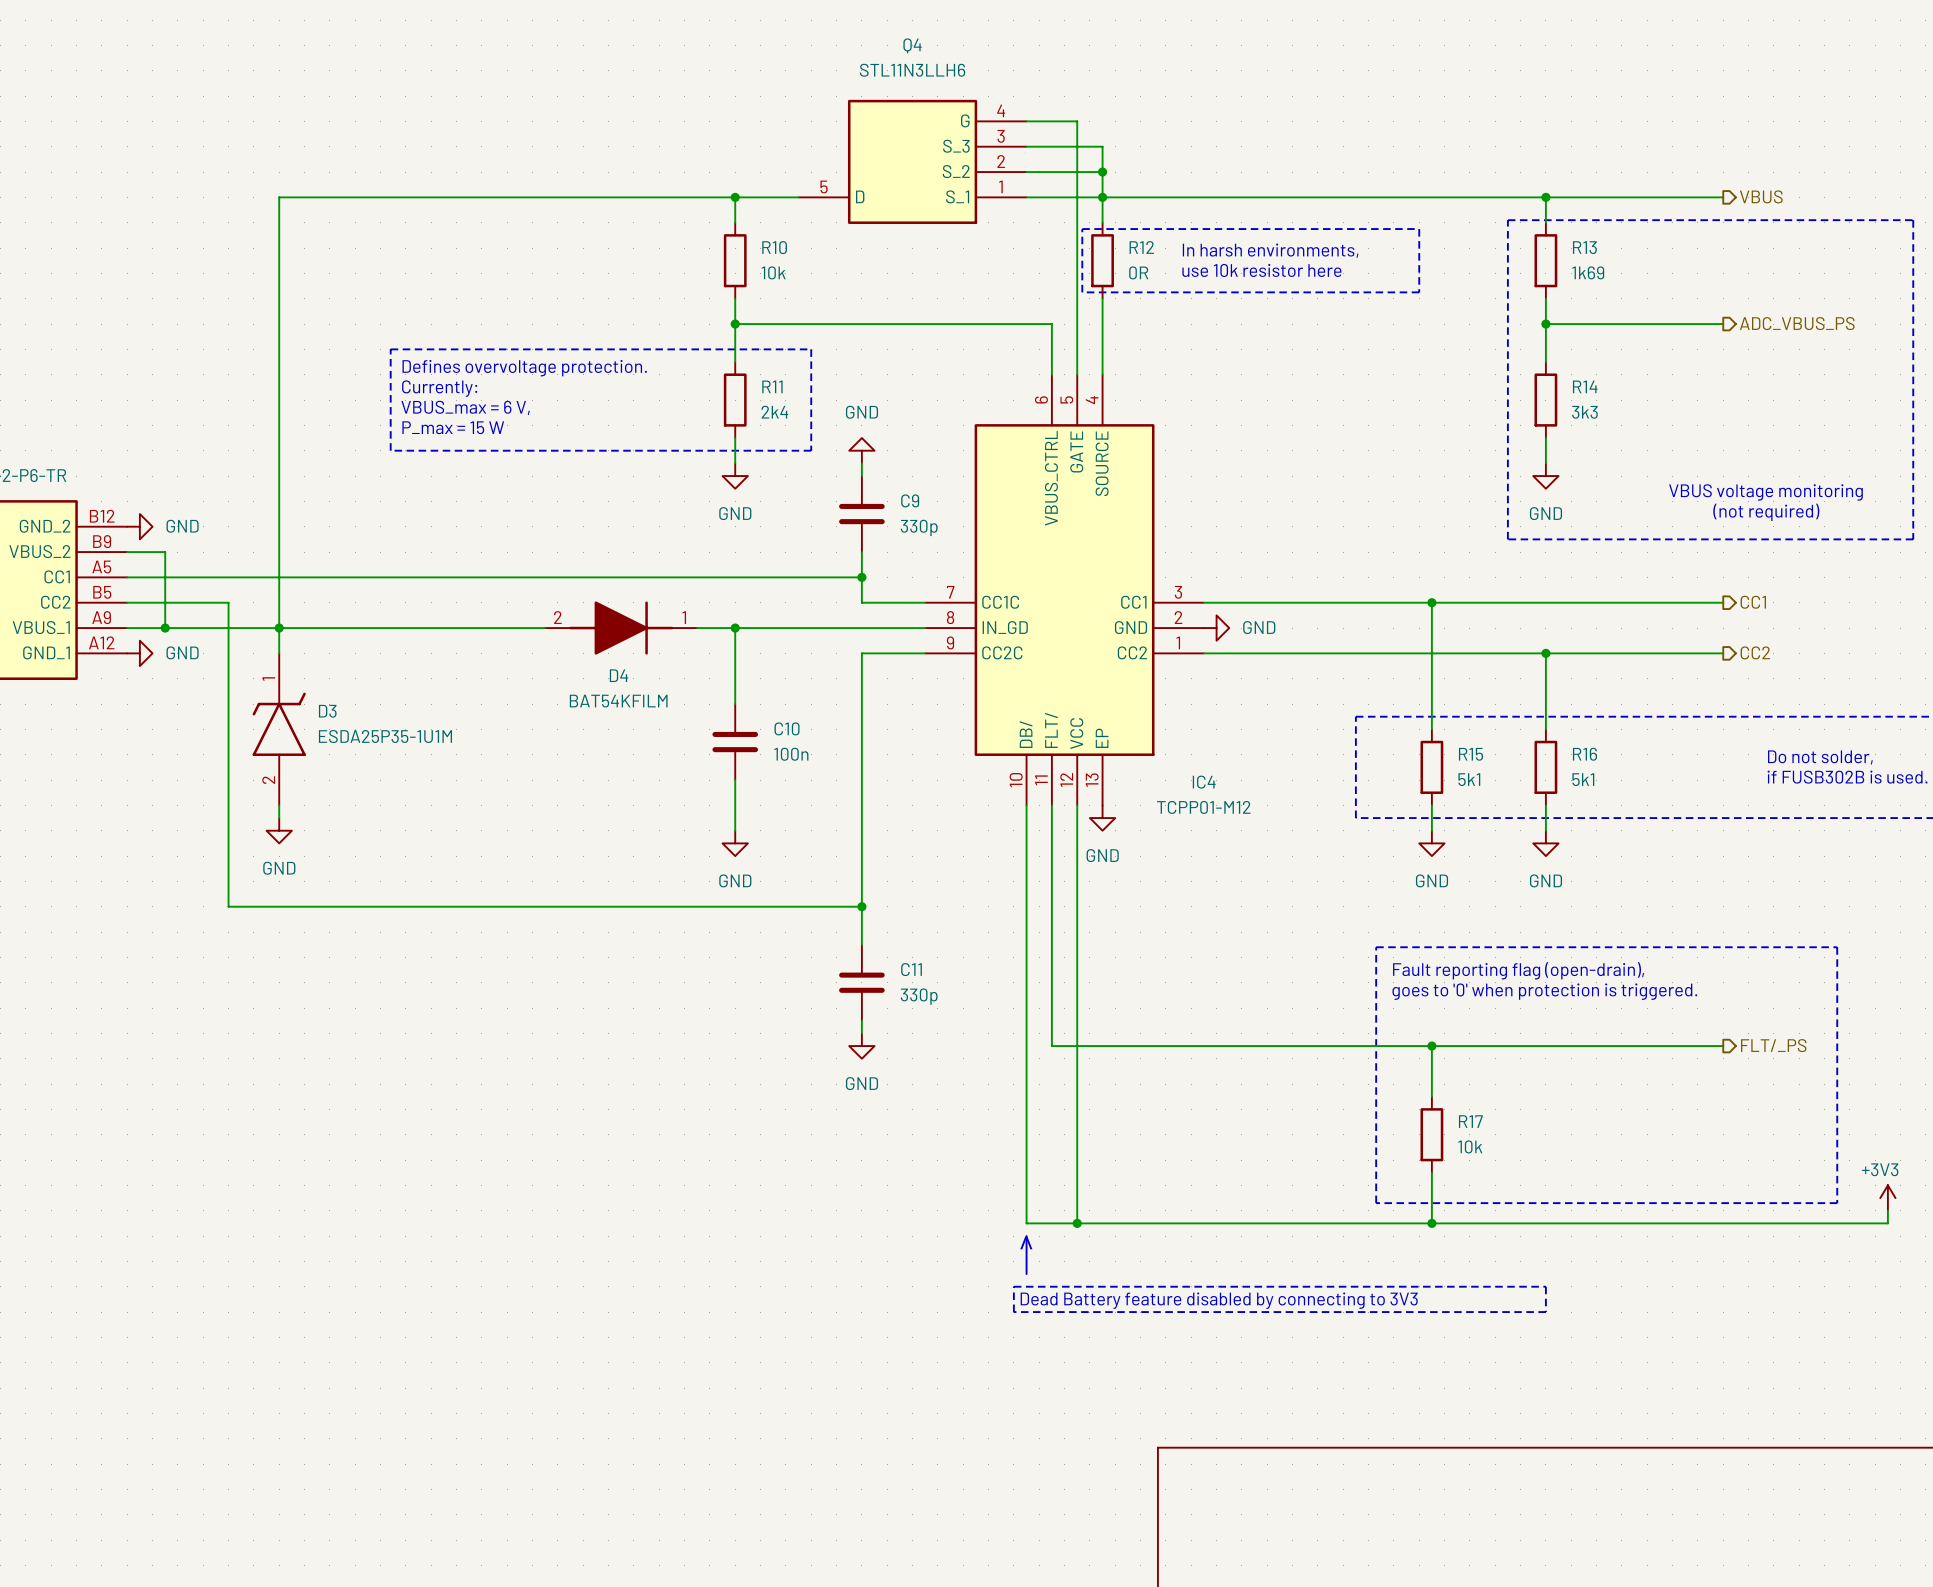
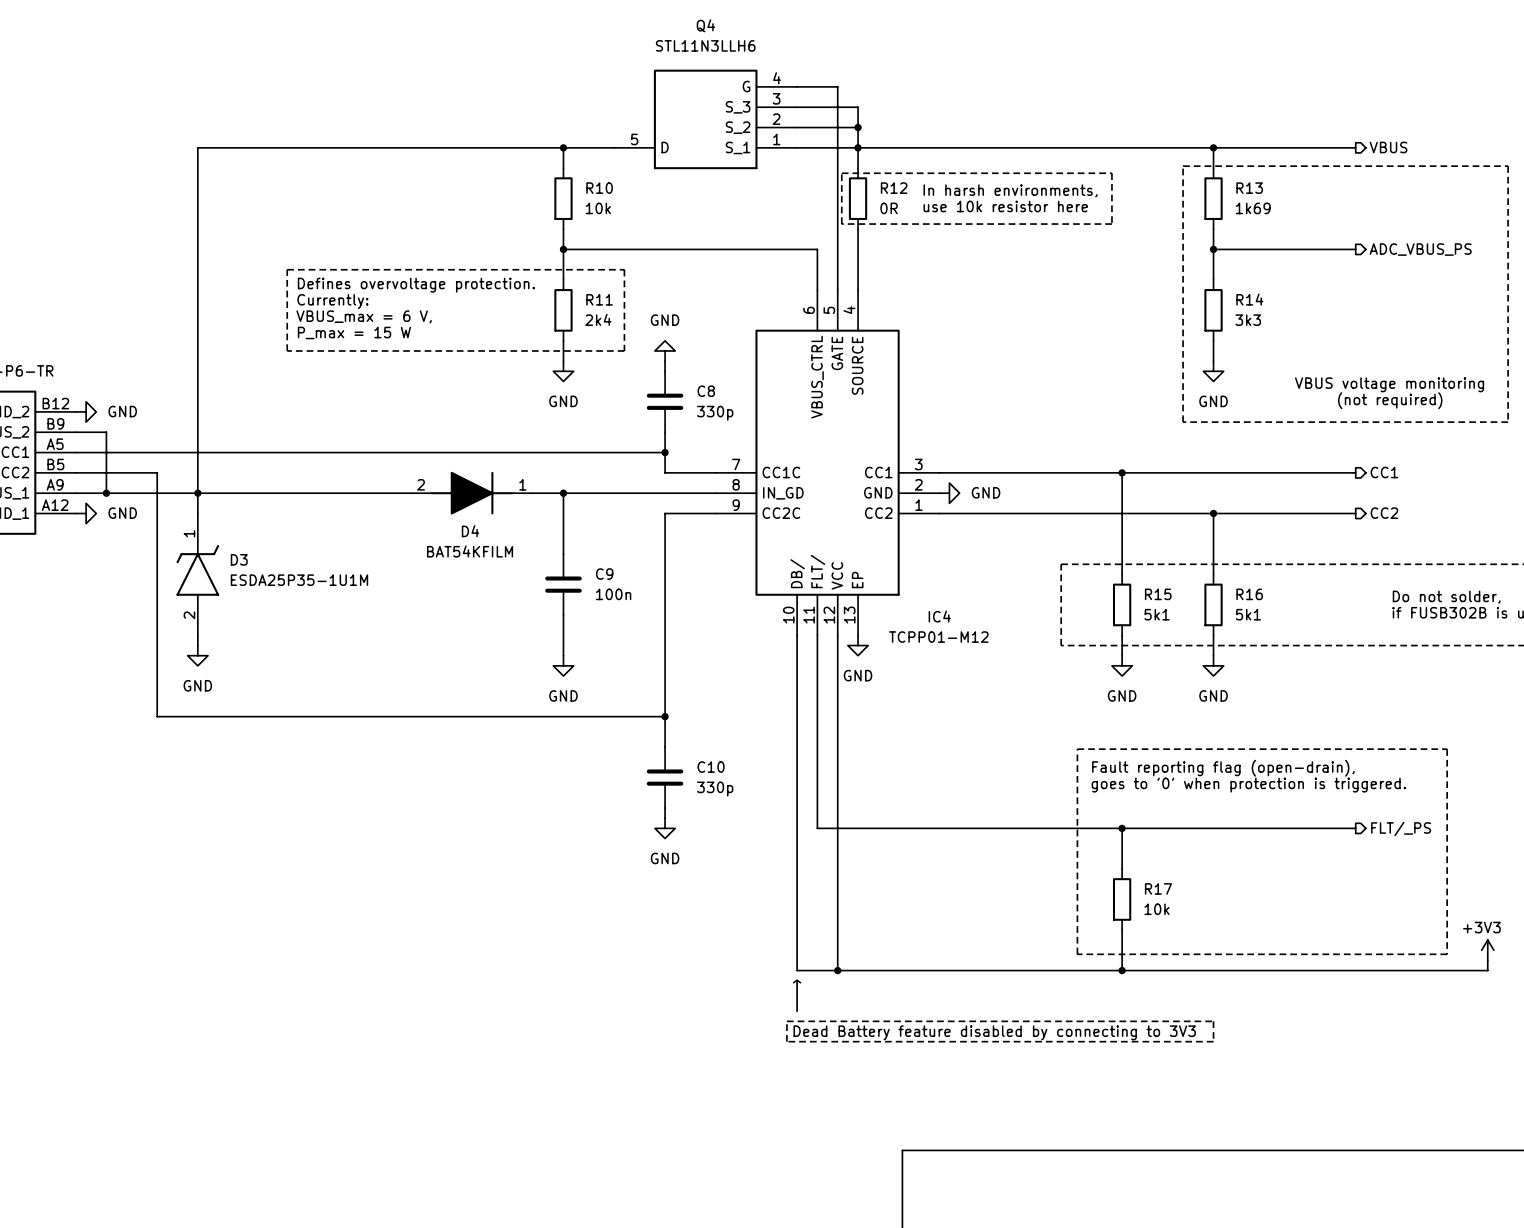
C9 name: C9 (910, 500) -> C8 (706, 391)
C10 name: C10 (787, 728) -> C9 (604, 574)
C11 name: C11 (911, 969) -> C10 (711, 767)

